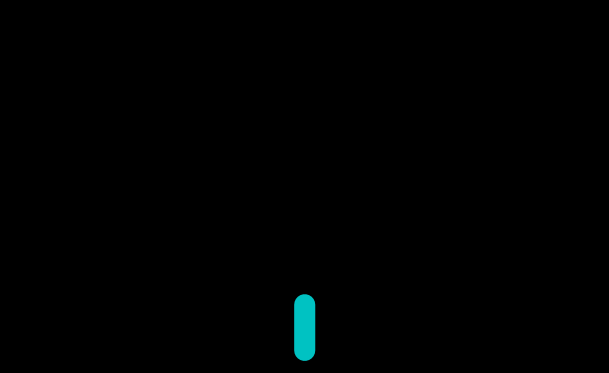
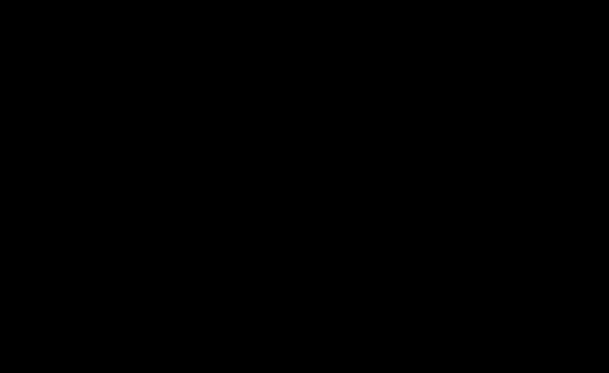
line: (304, 304) (304, 350) -> none

